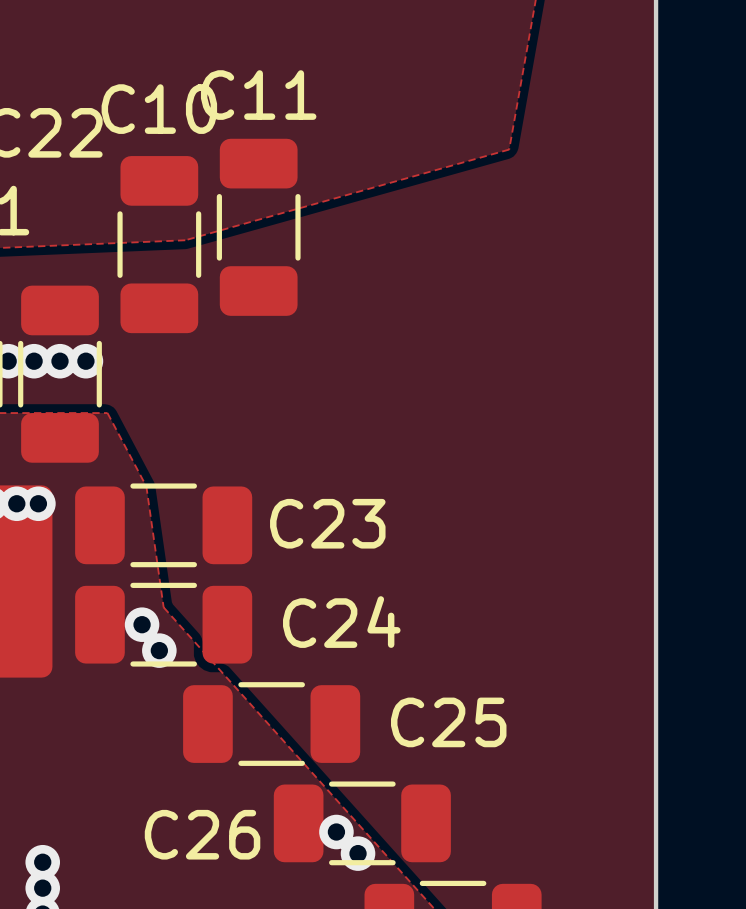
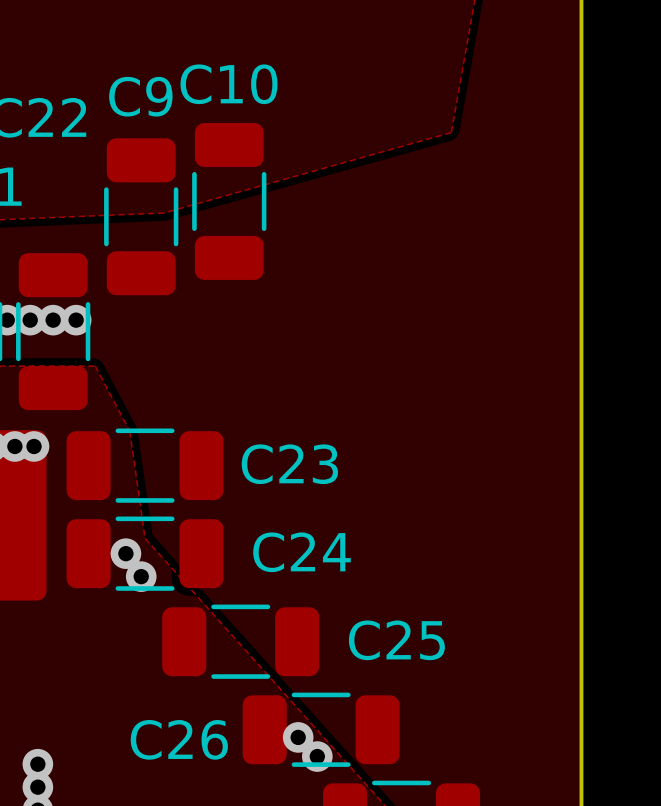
C11 name: C11 (258, 95) -> C10 (229, 84)
C10 name: C10 (159, 109) -> C9 (140, 96)

